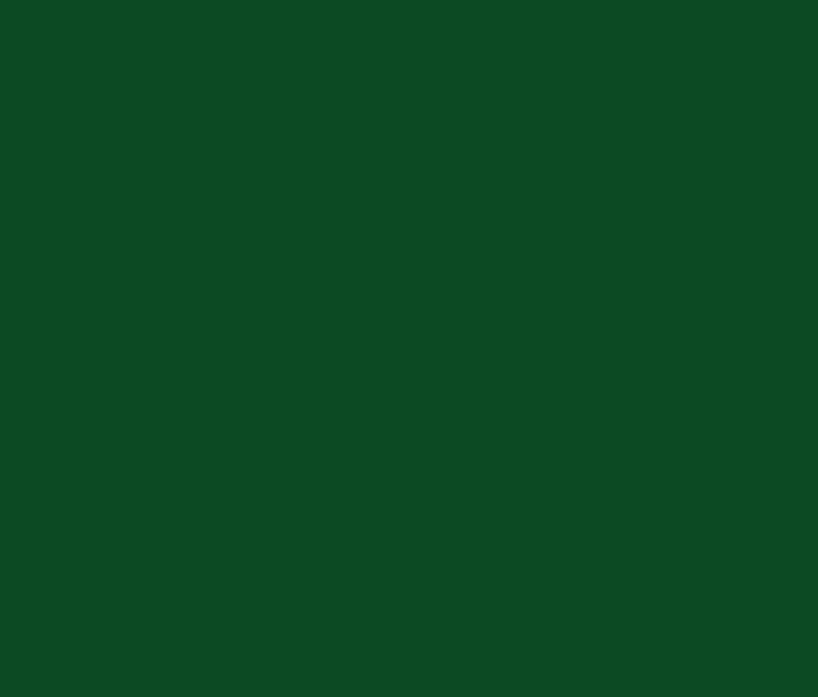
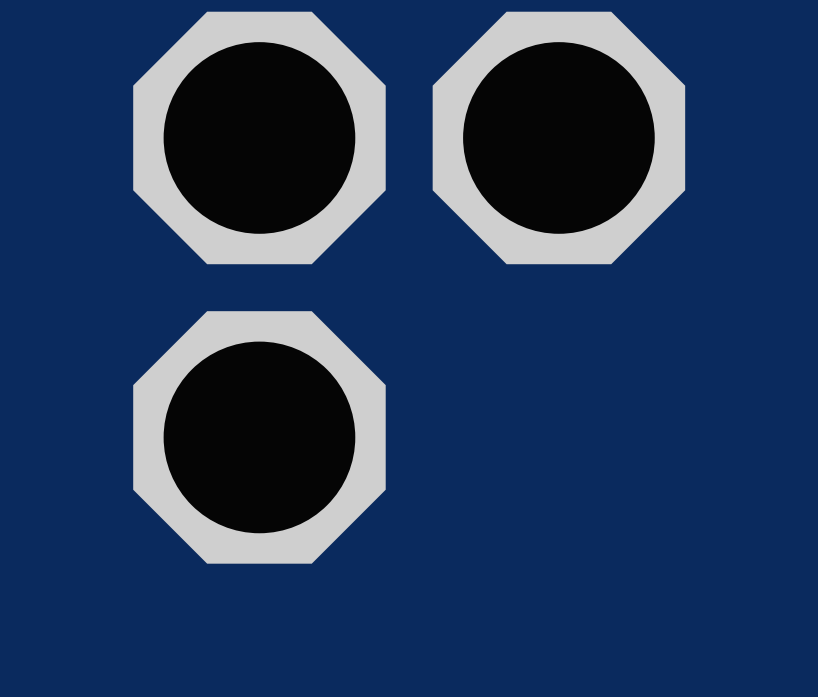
part: none -> (259, 137)
part: none -> (558, 137)
part: none -> (259, 437)

